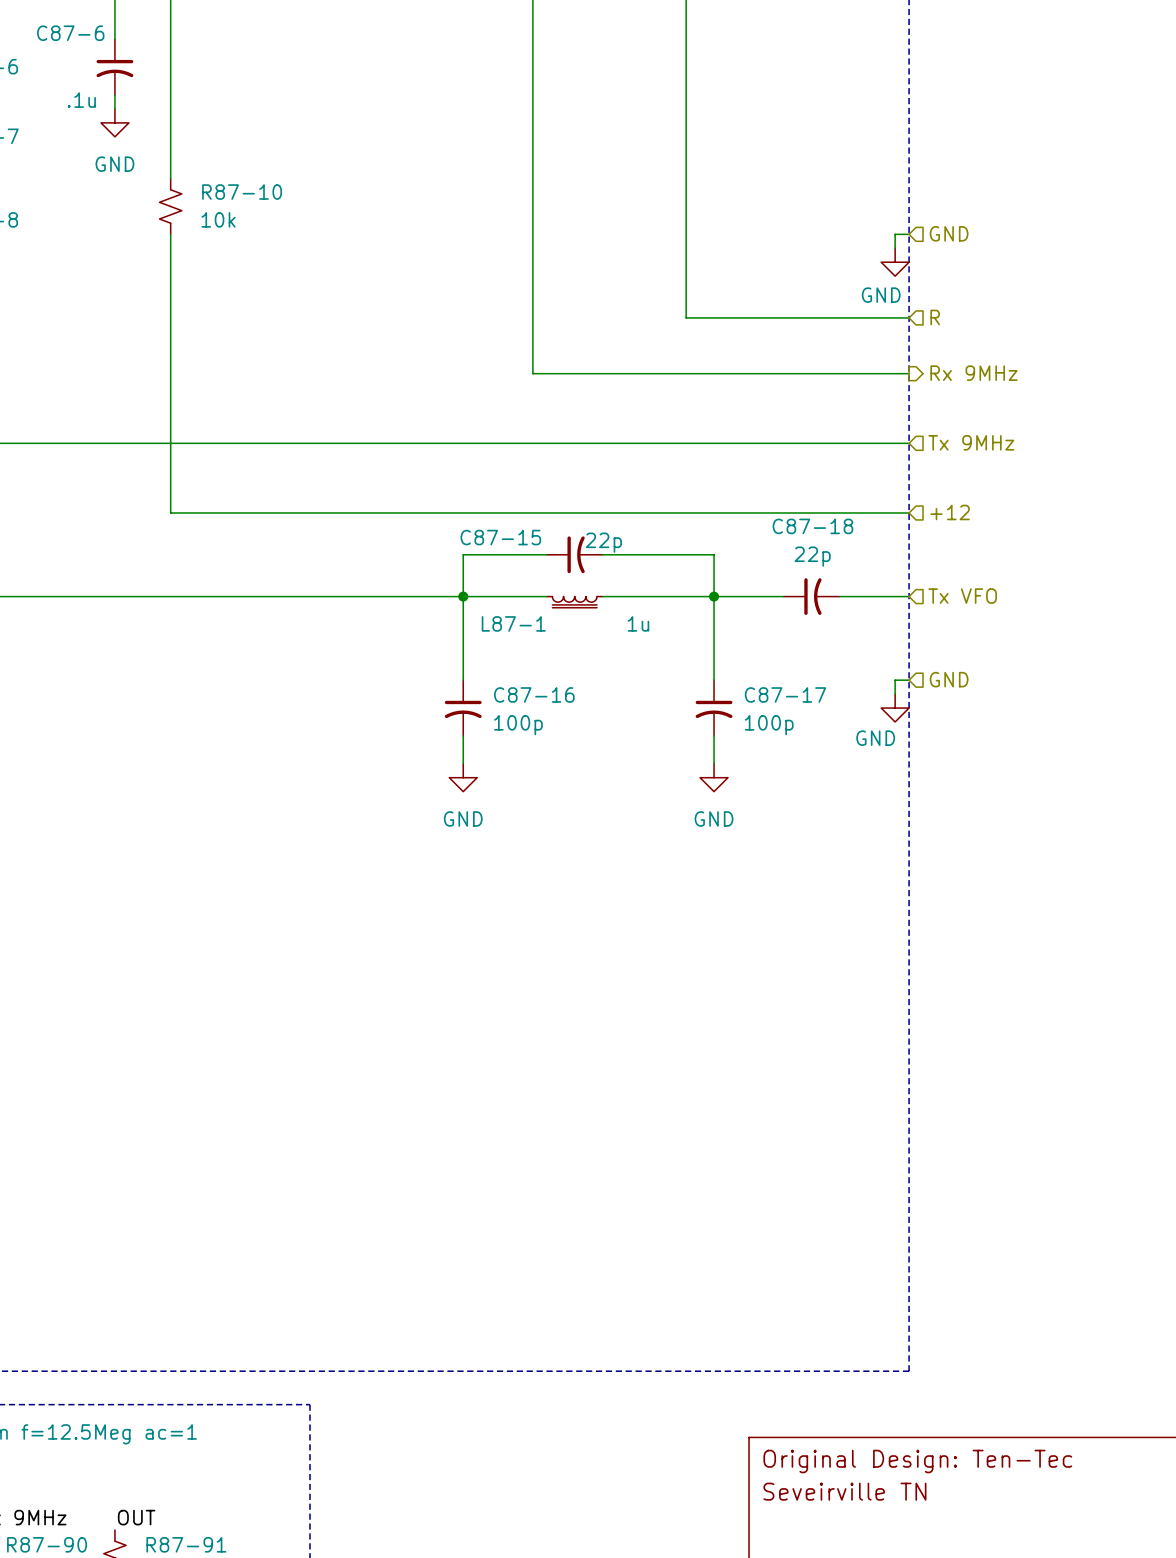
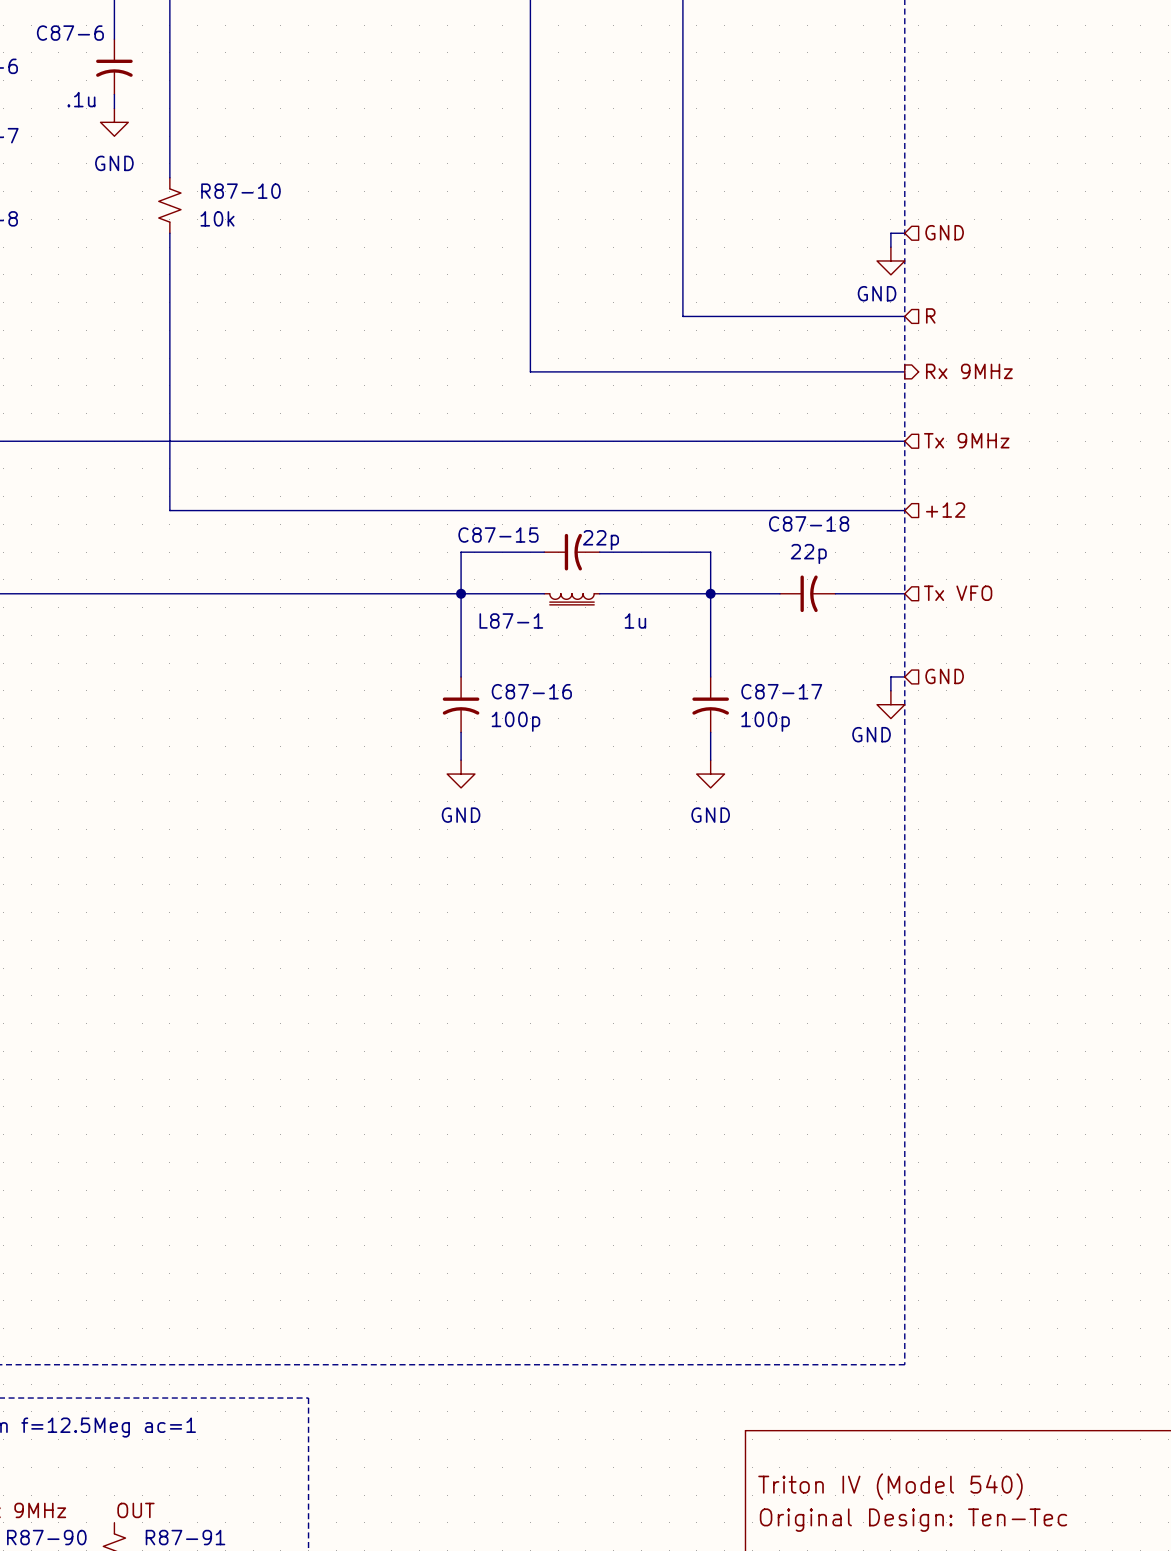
title block position: Original Design: Ten-Tec (917, 1461) -> Original Design: Ten-Tec (913, 1520)
title block: Seveirville TN (844, 1491) -> Triton IV (Model 540) (890, 1486)

